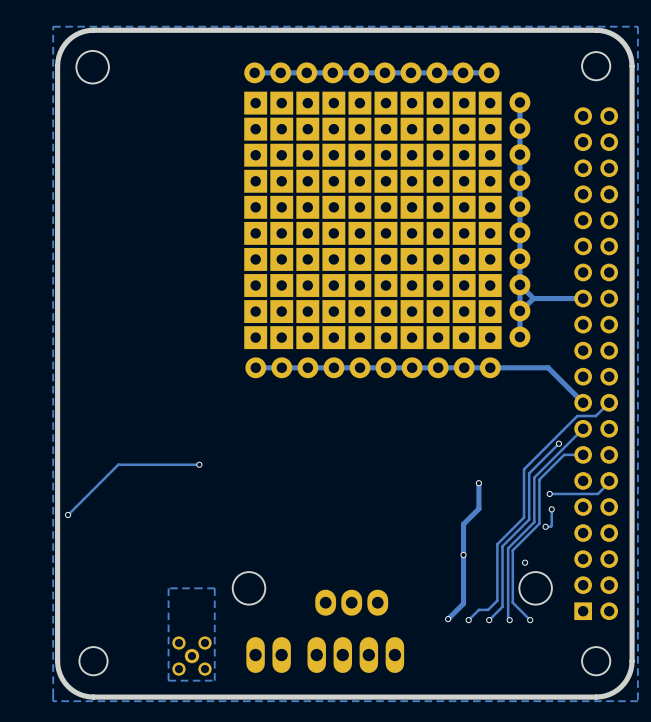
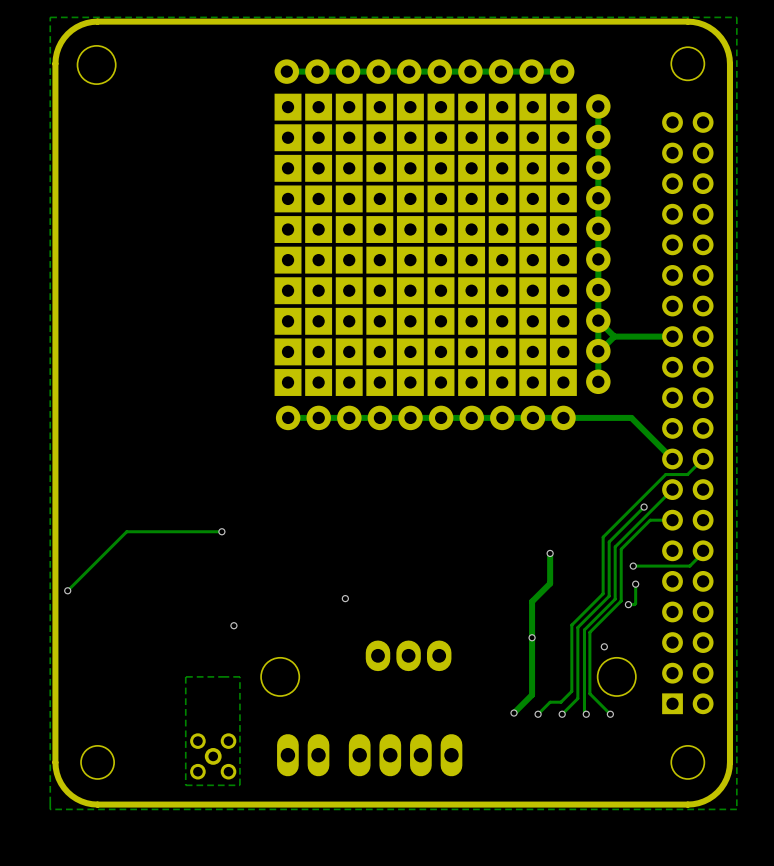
via: none -> (345, 598)
via: none -> (233, 625)
part position: (351, 602) -> (408, 655)

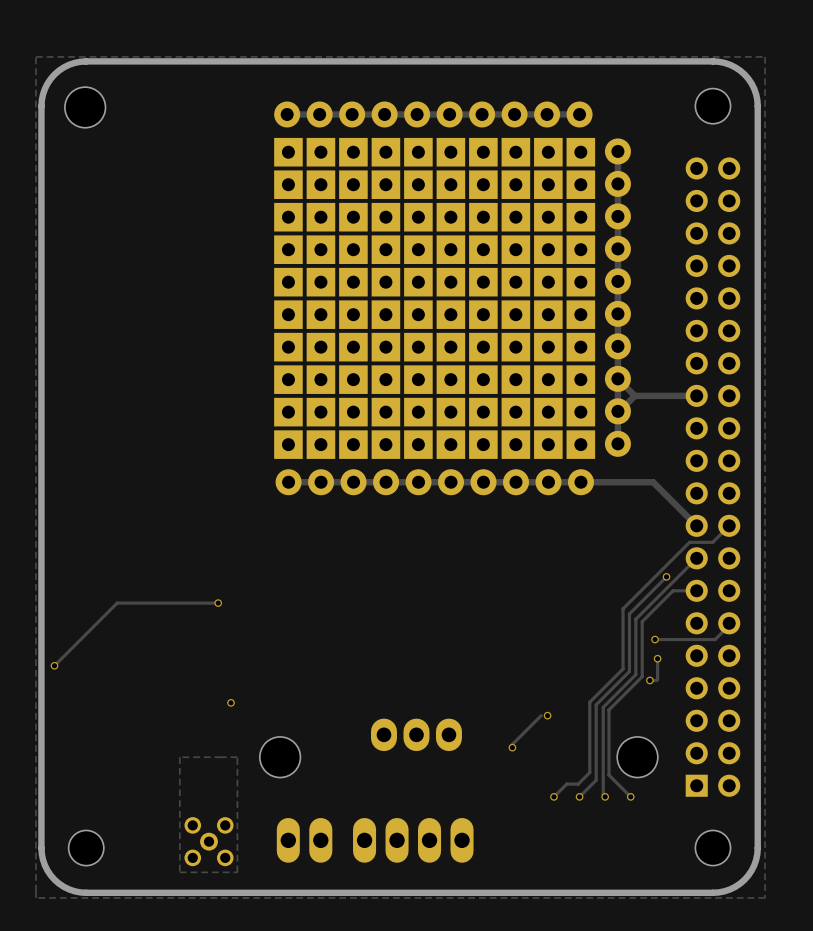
track: (550, 553) (550, 583) (532, 601) (532, 694) (514, 713) -> none
via: (550, 553) -> none
via: (345, 598) -> none
track: none -> (541, 715) (512, 744) (512, 747)
via: (604, 646) -> none
via position: (514, 713) -> (512, 747)

